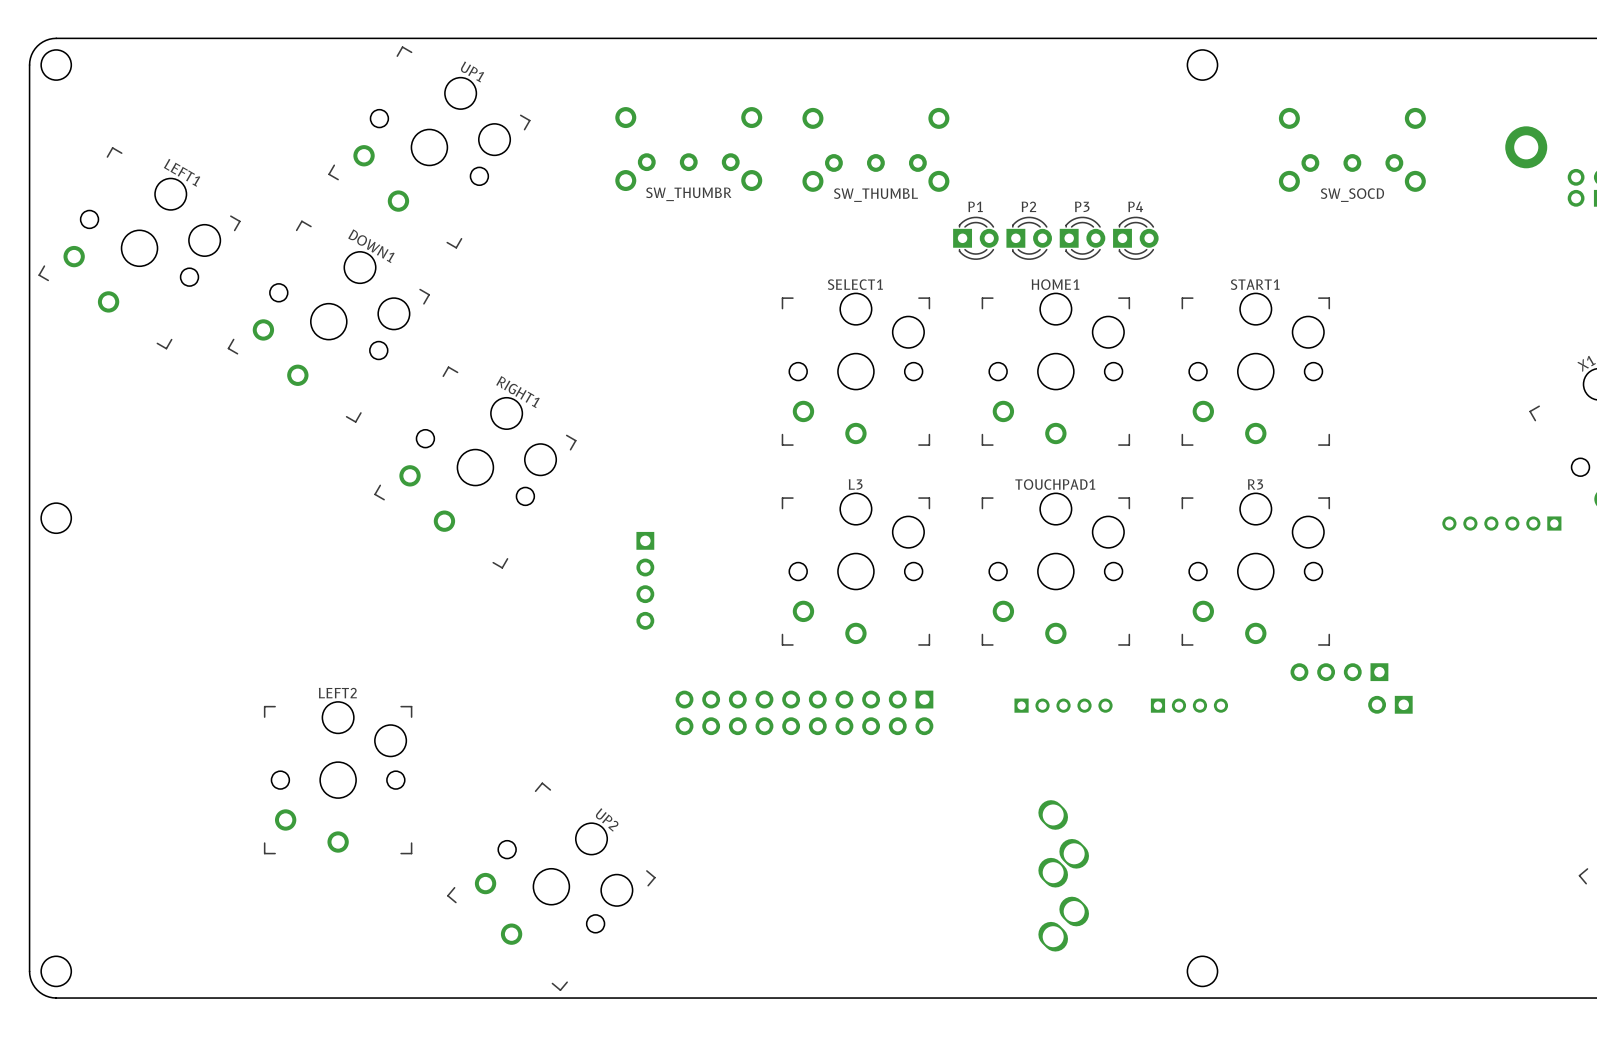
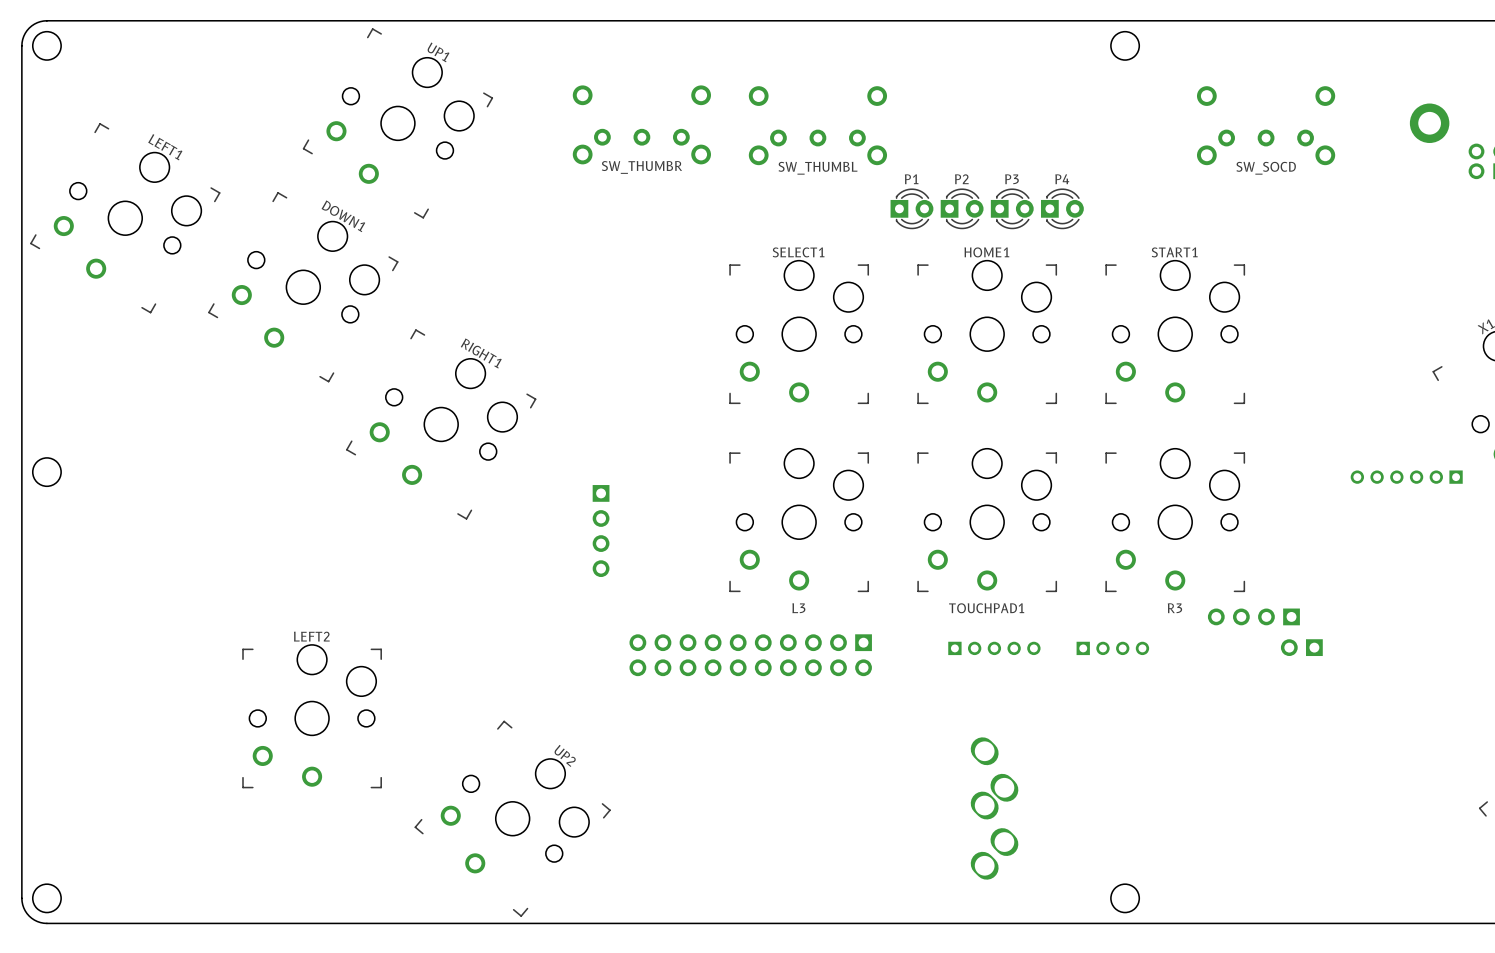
L3 name position: L3 (855, 484) -> L3 (798, 608)
TOUCHPAD1 name position: TOUCHPAD1 (1055, 484) -> TOUCHPAD1 (986, 608)
R3 name position: R3 (1255, 484) -> R3 (1174, 608)

